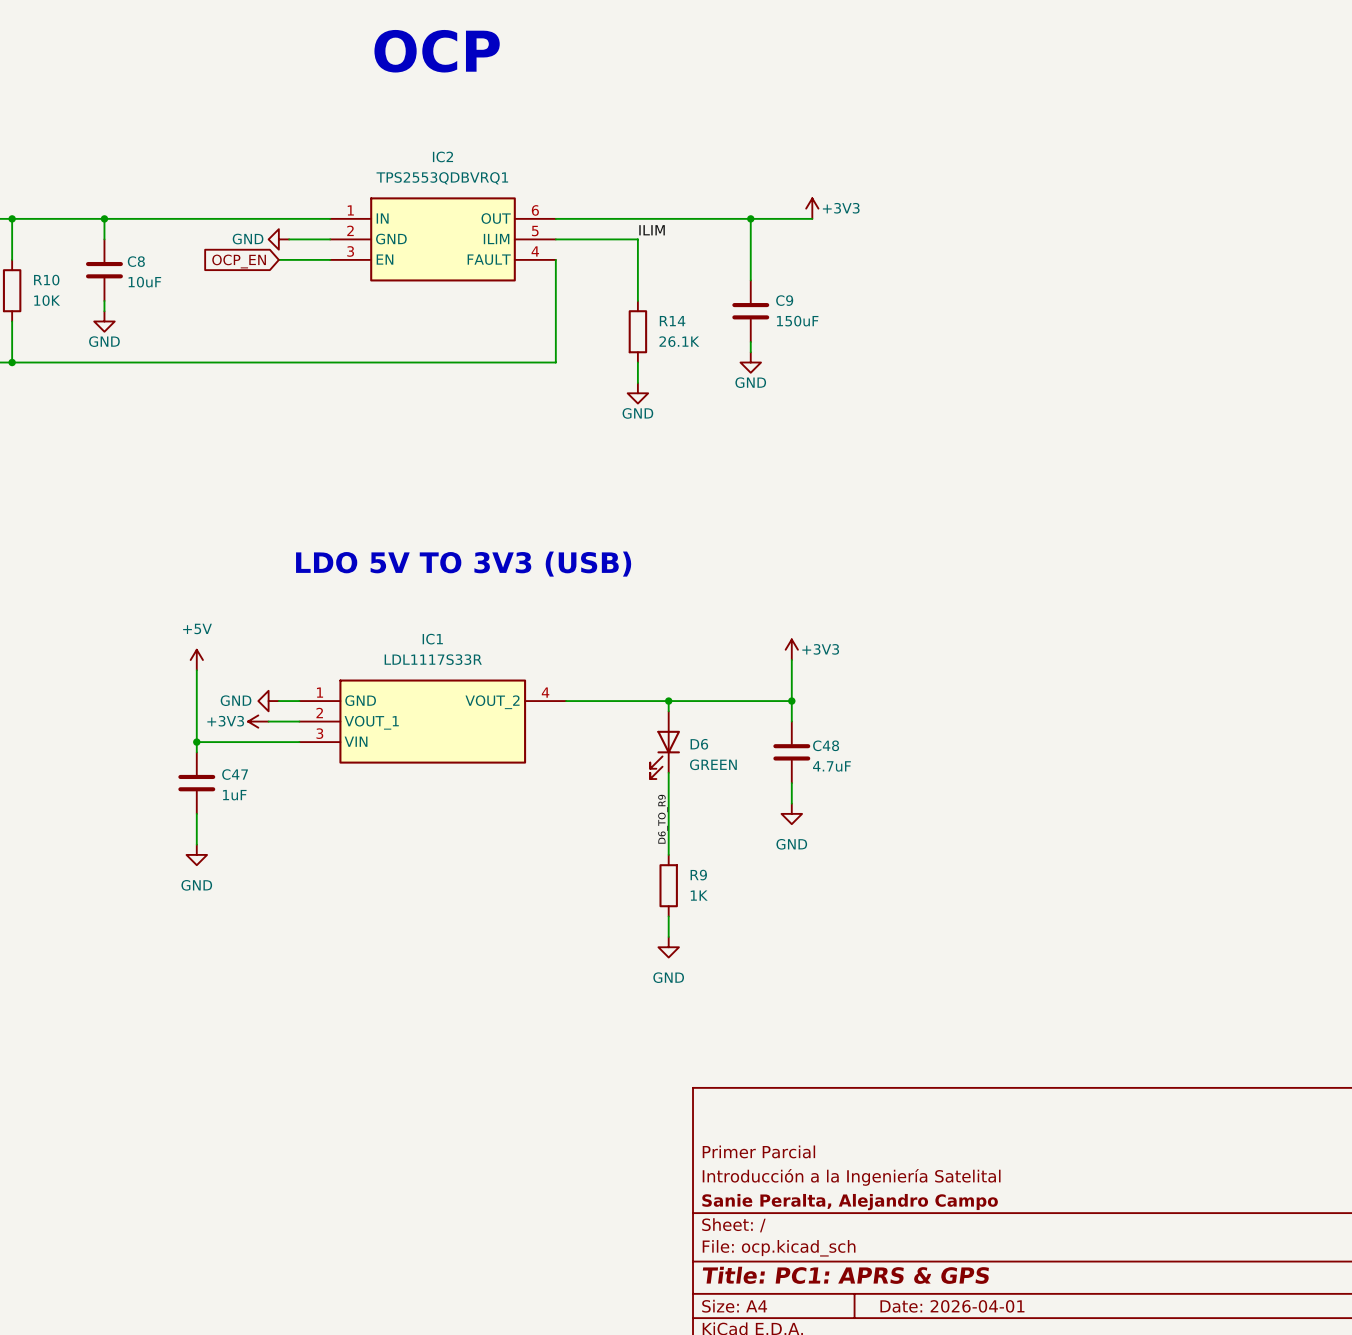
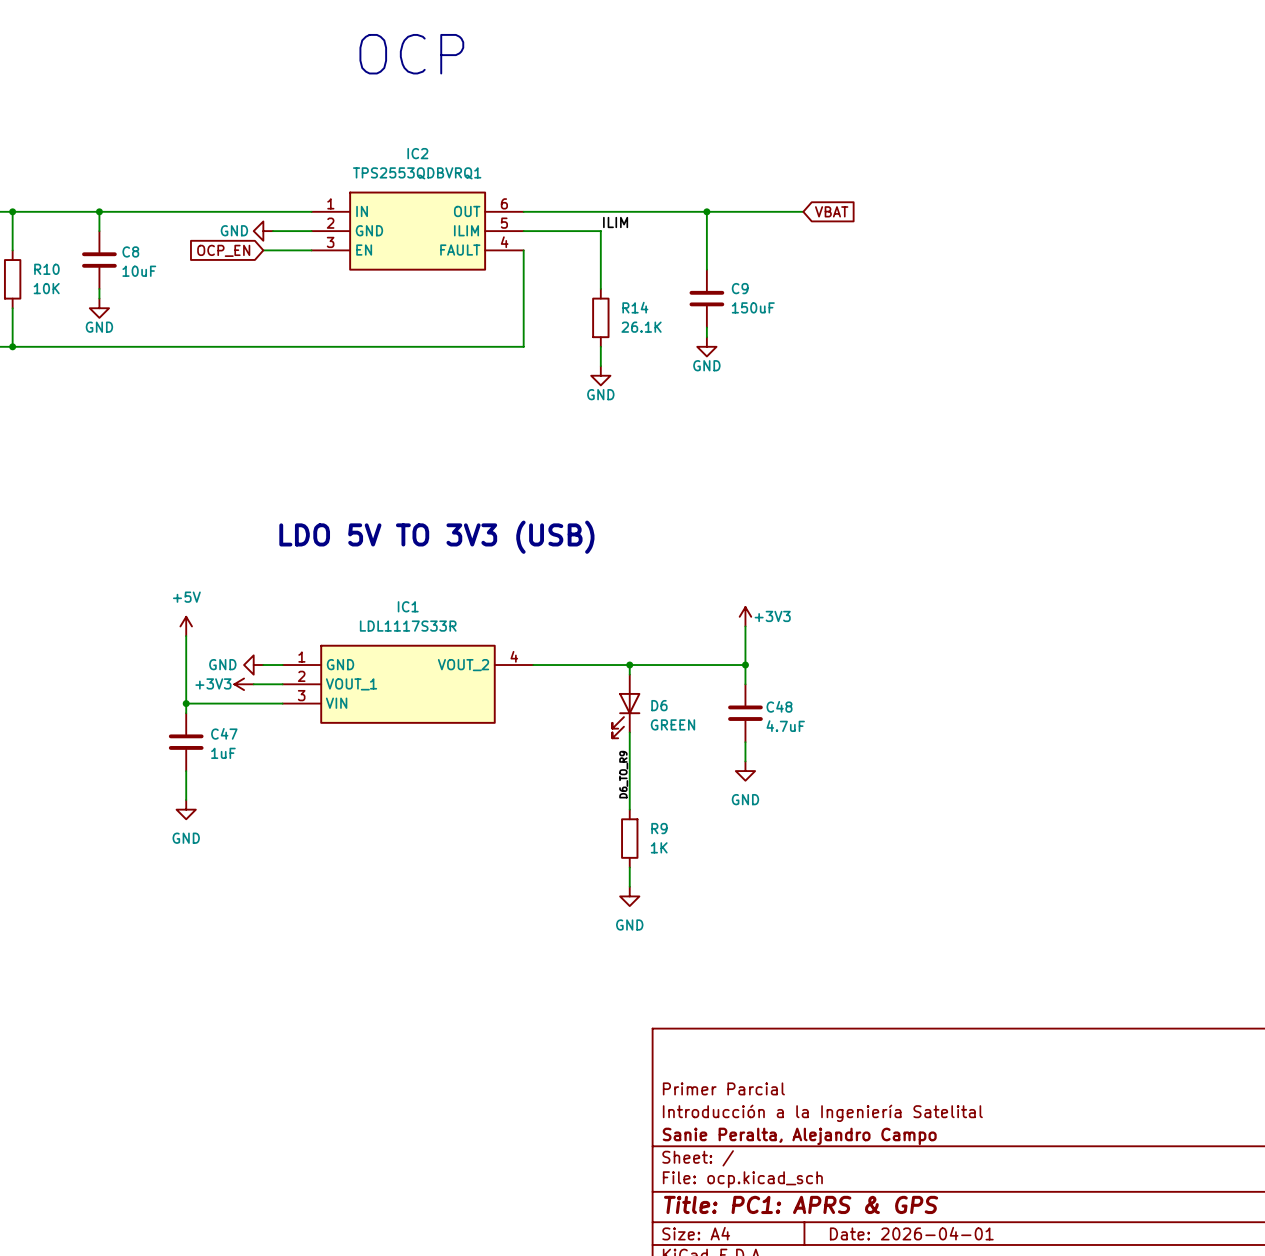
power symbol: +3V3 (812, 208) -> none
wire: none -> (764, 211) (803, 211)
global label: none -> VBAT (831, 211)

